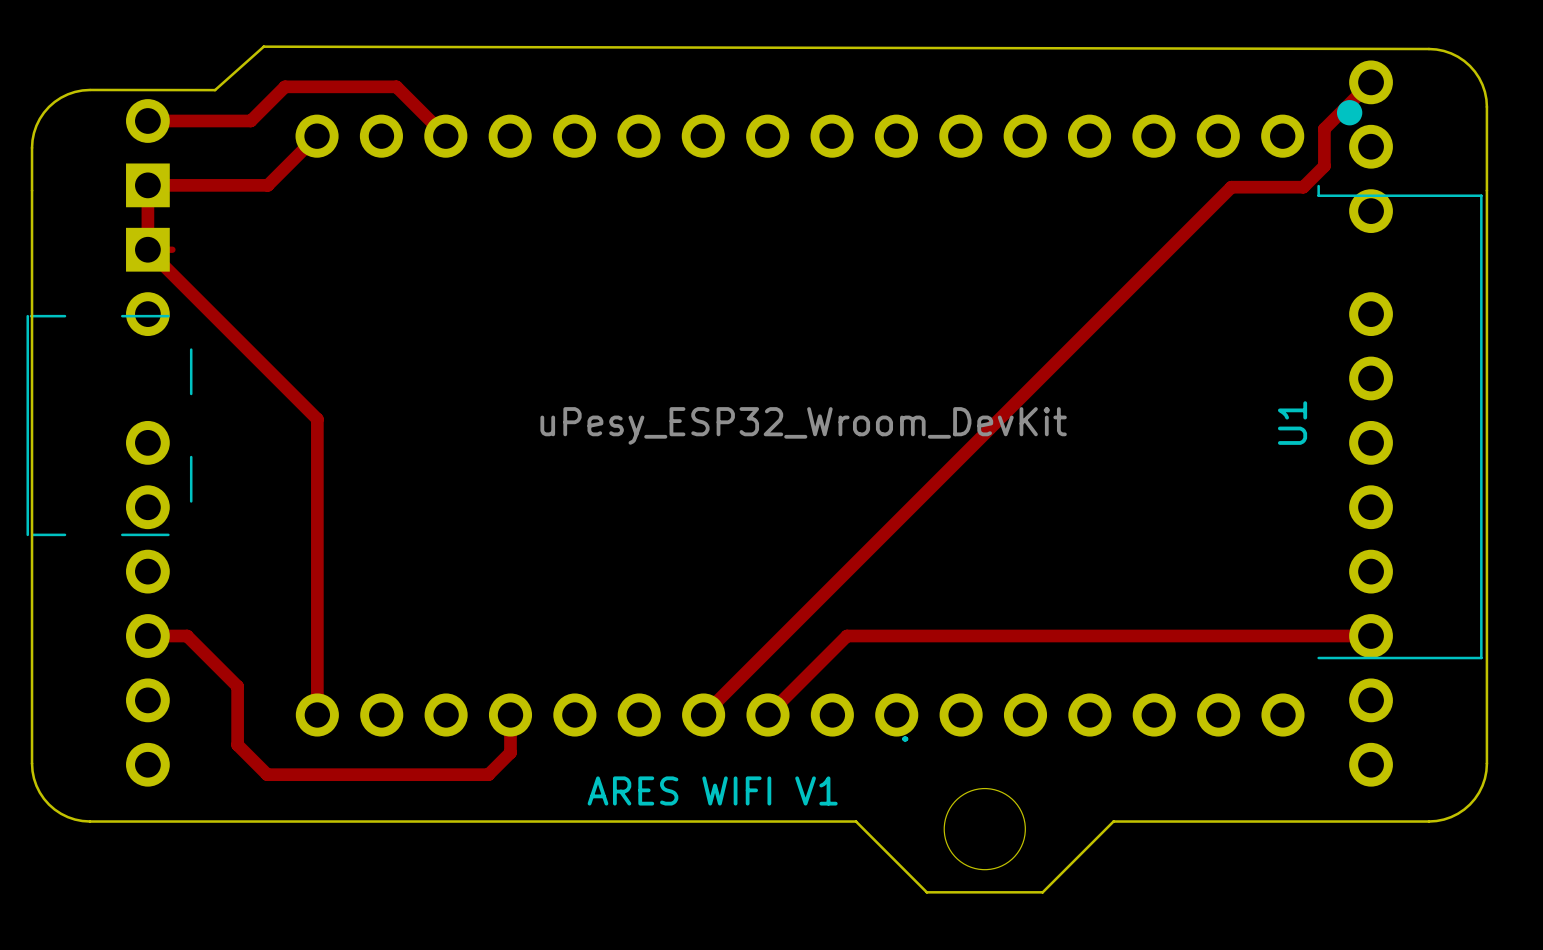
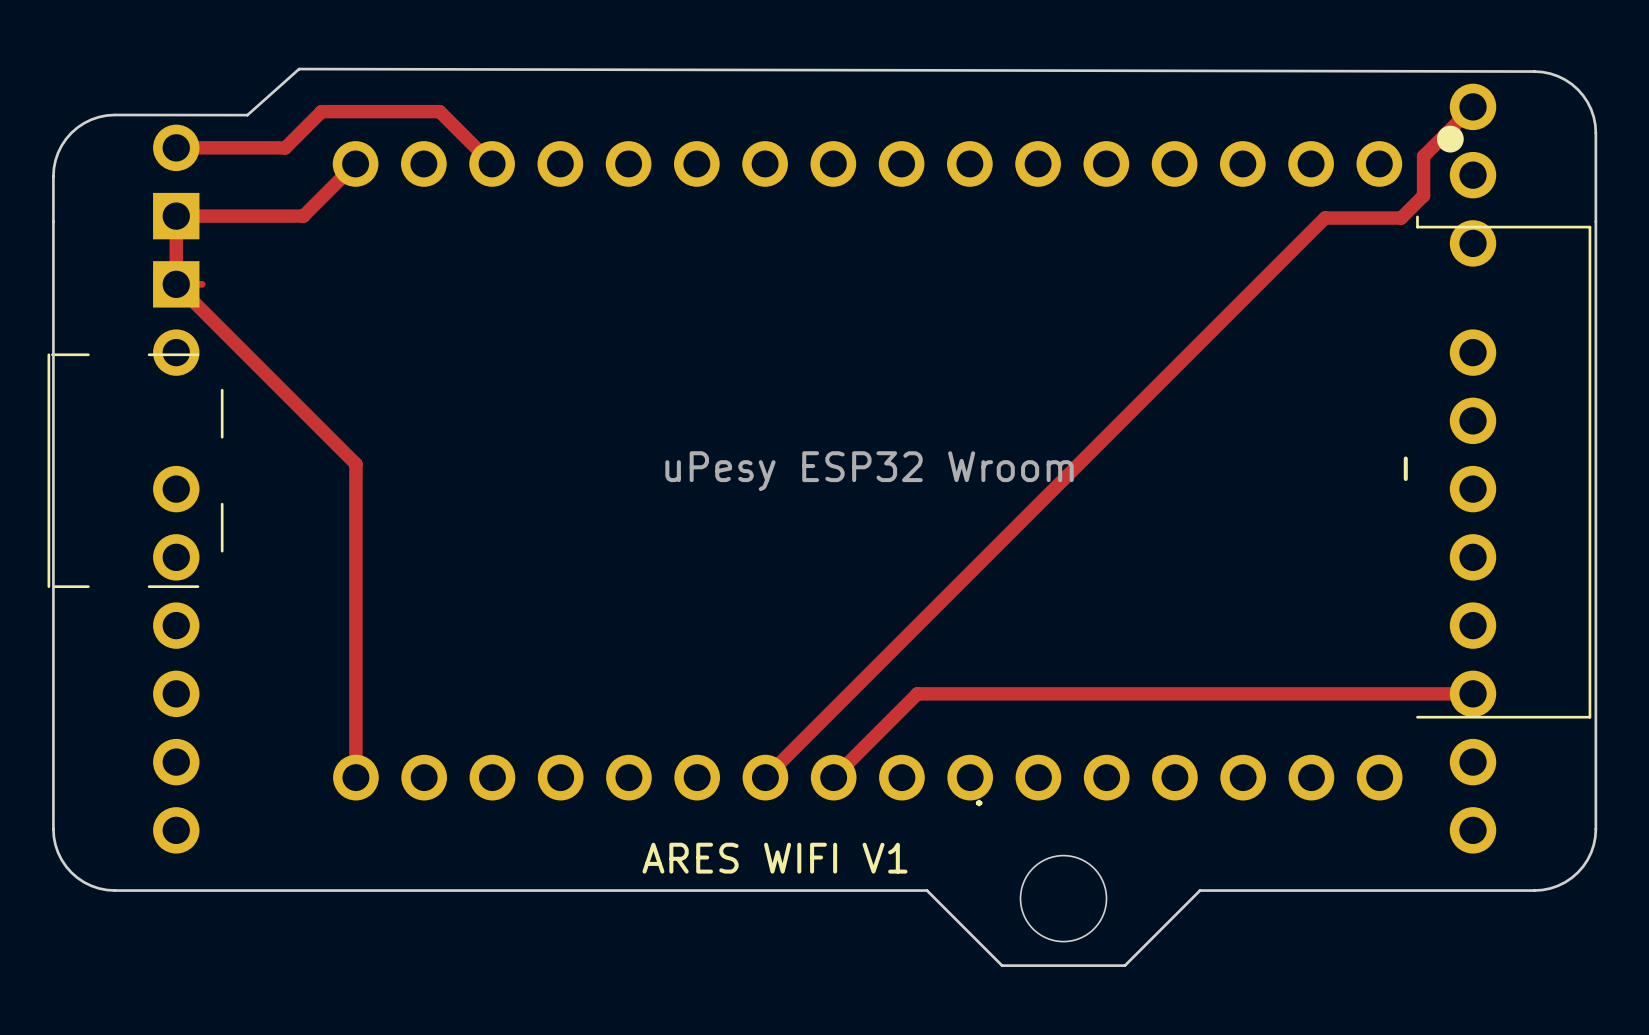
U1 name: U1 (1292, 423) -> _ (1405, 468)
U1 value: uPesy_ESP32_Wroom_DevKit (803, 425) -> uPesy ESP32 Wroom (869, 471)
track: (147, 635) (187, 635) (237, 686) (237, 745) (267, 774) (488, 774) (510, 752) (510, 715) -> none

